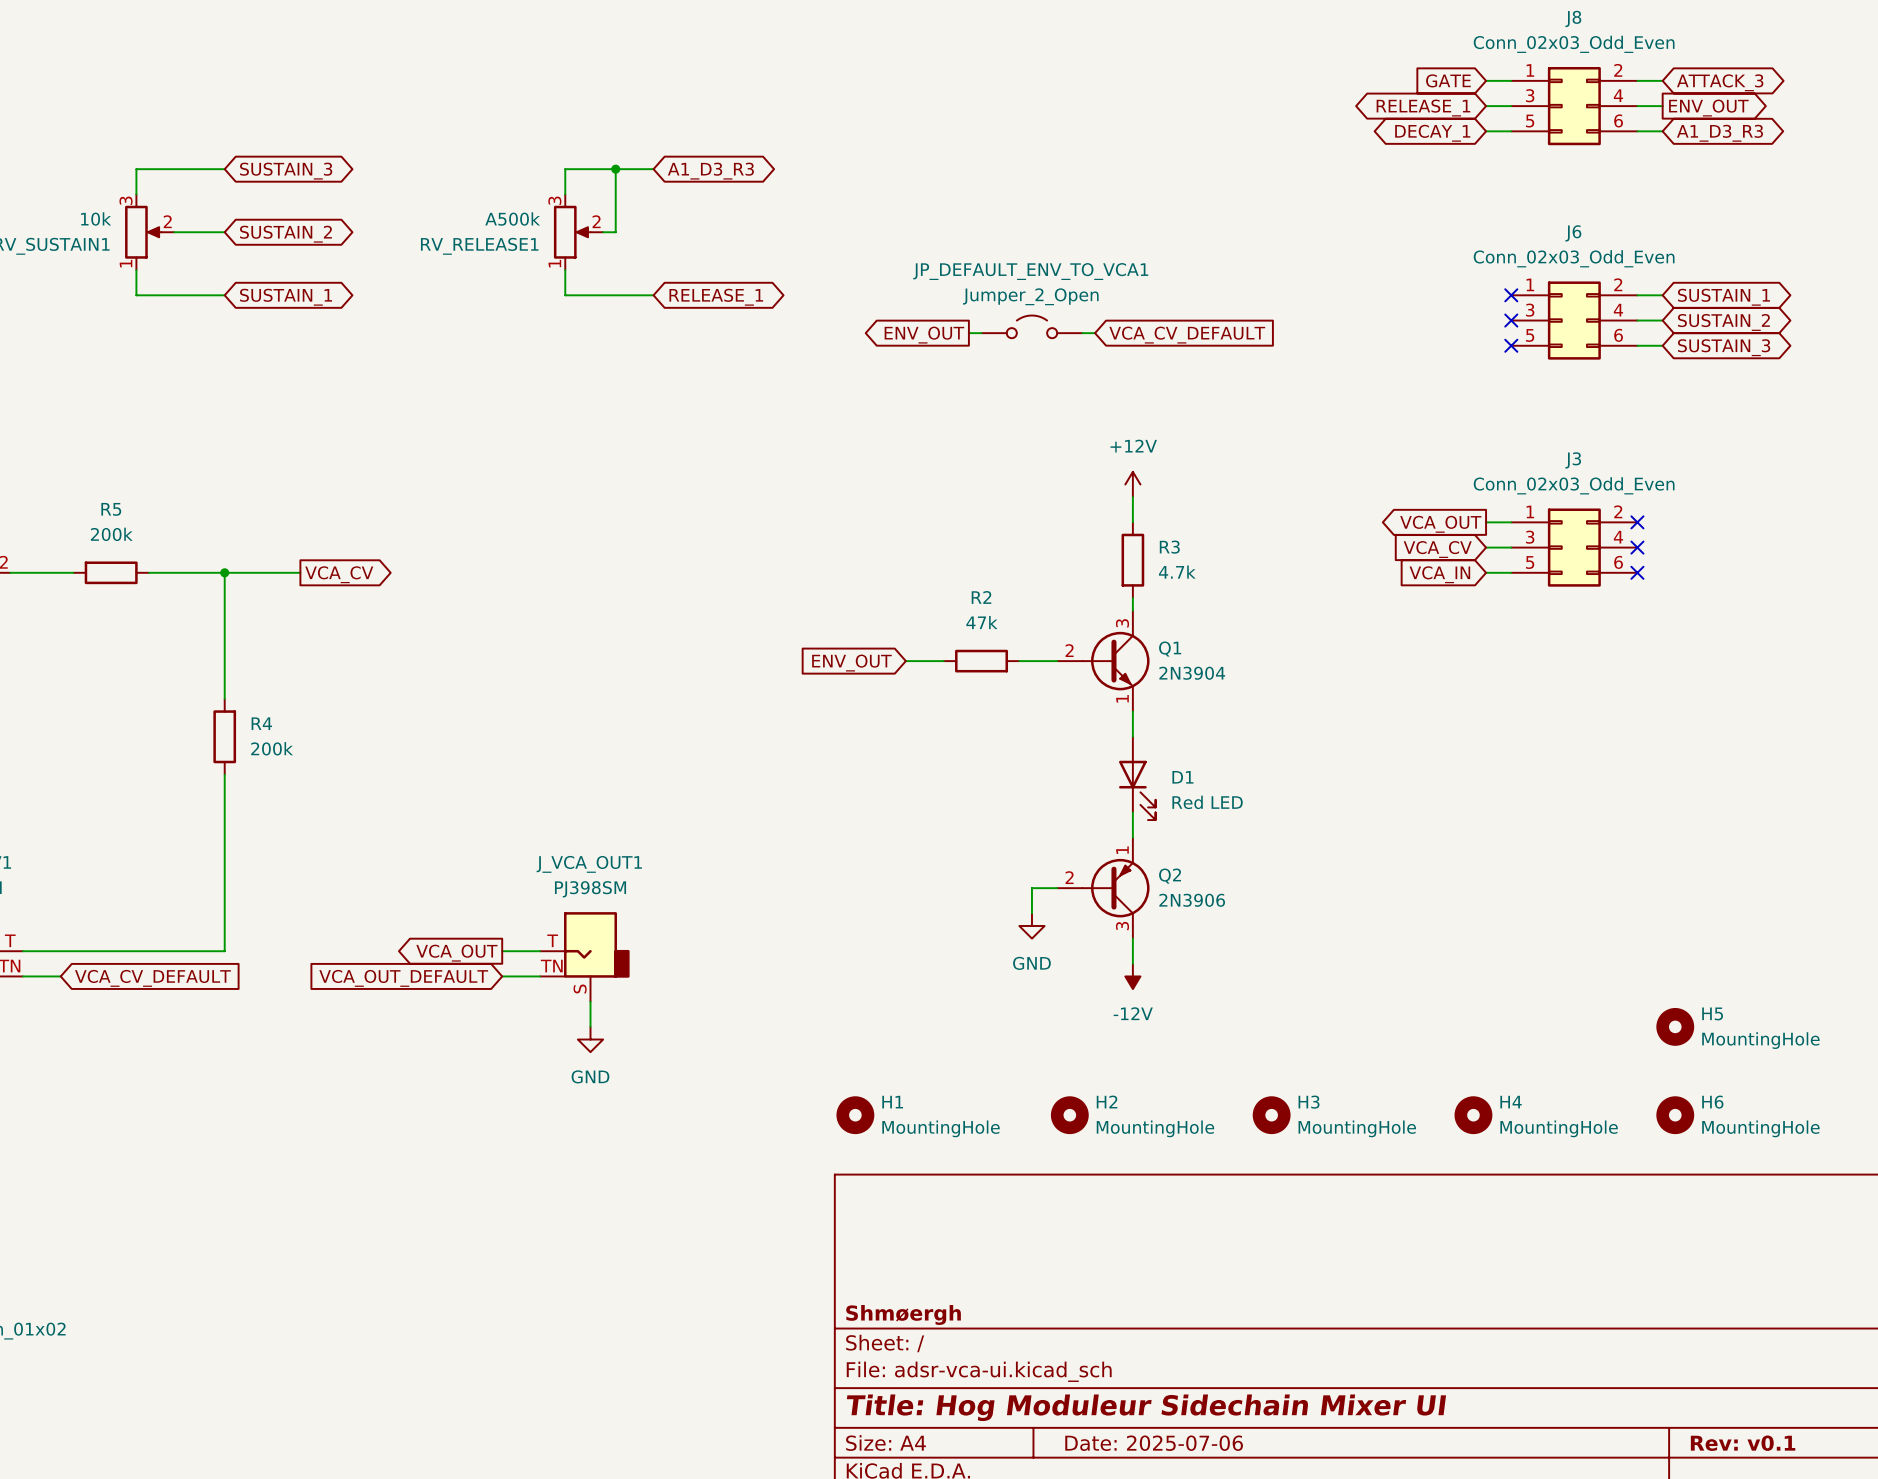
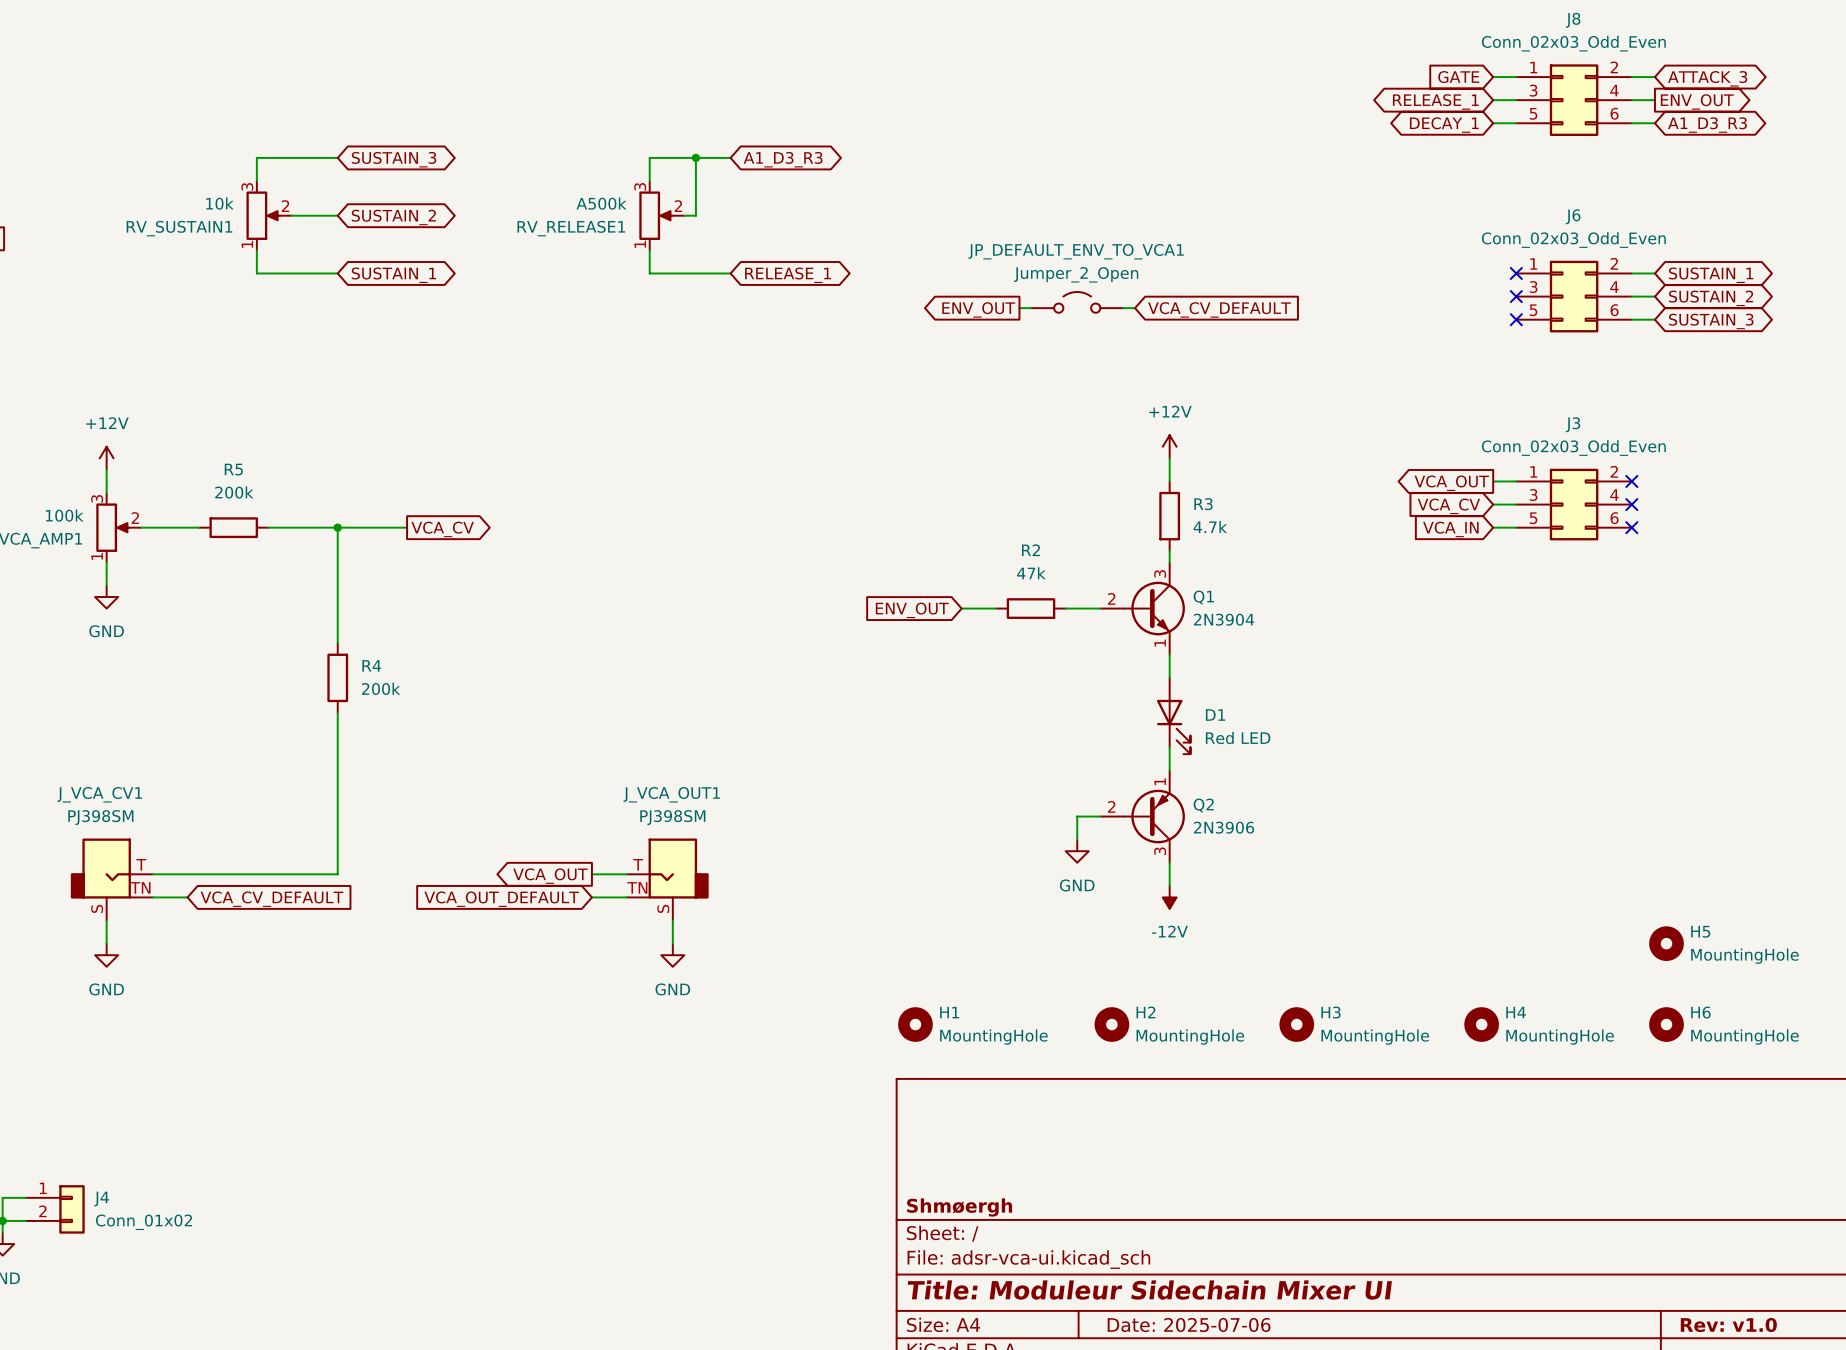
title block: Title: Hog Moduleur Sidechain Mixer UI (1146, 1407) -> Title: Moduleur Sidechain Mixer UI (1149, 1290)
title block: Rev: v0.1 (1743, 1443) -> Rev: v1.0 (1728, 1324)

